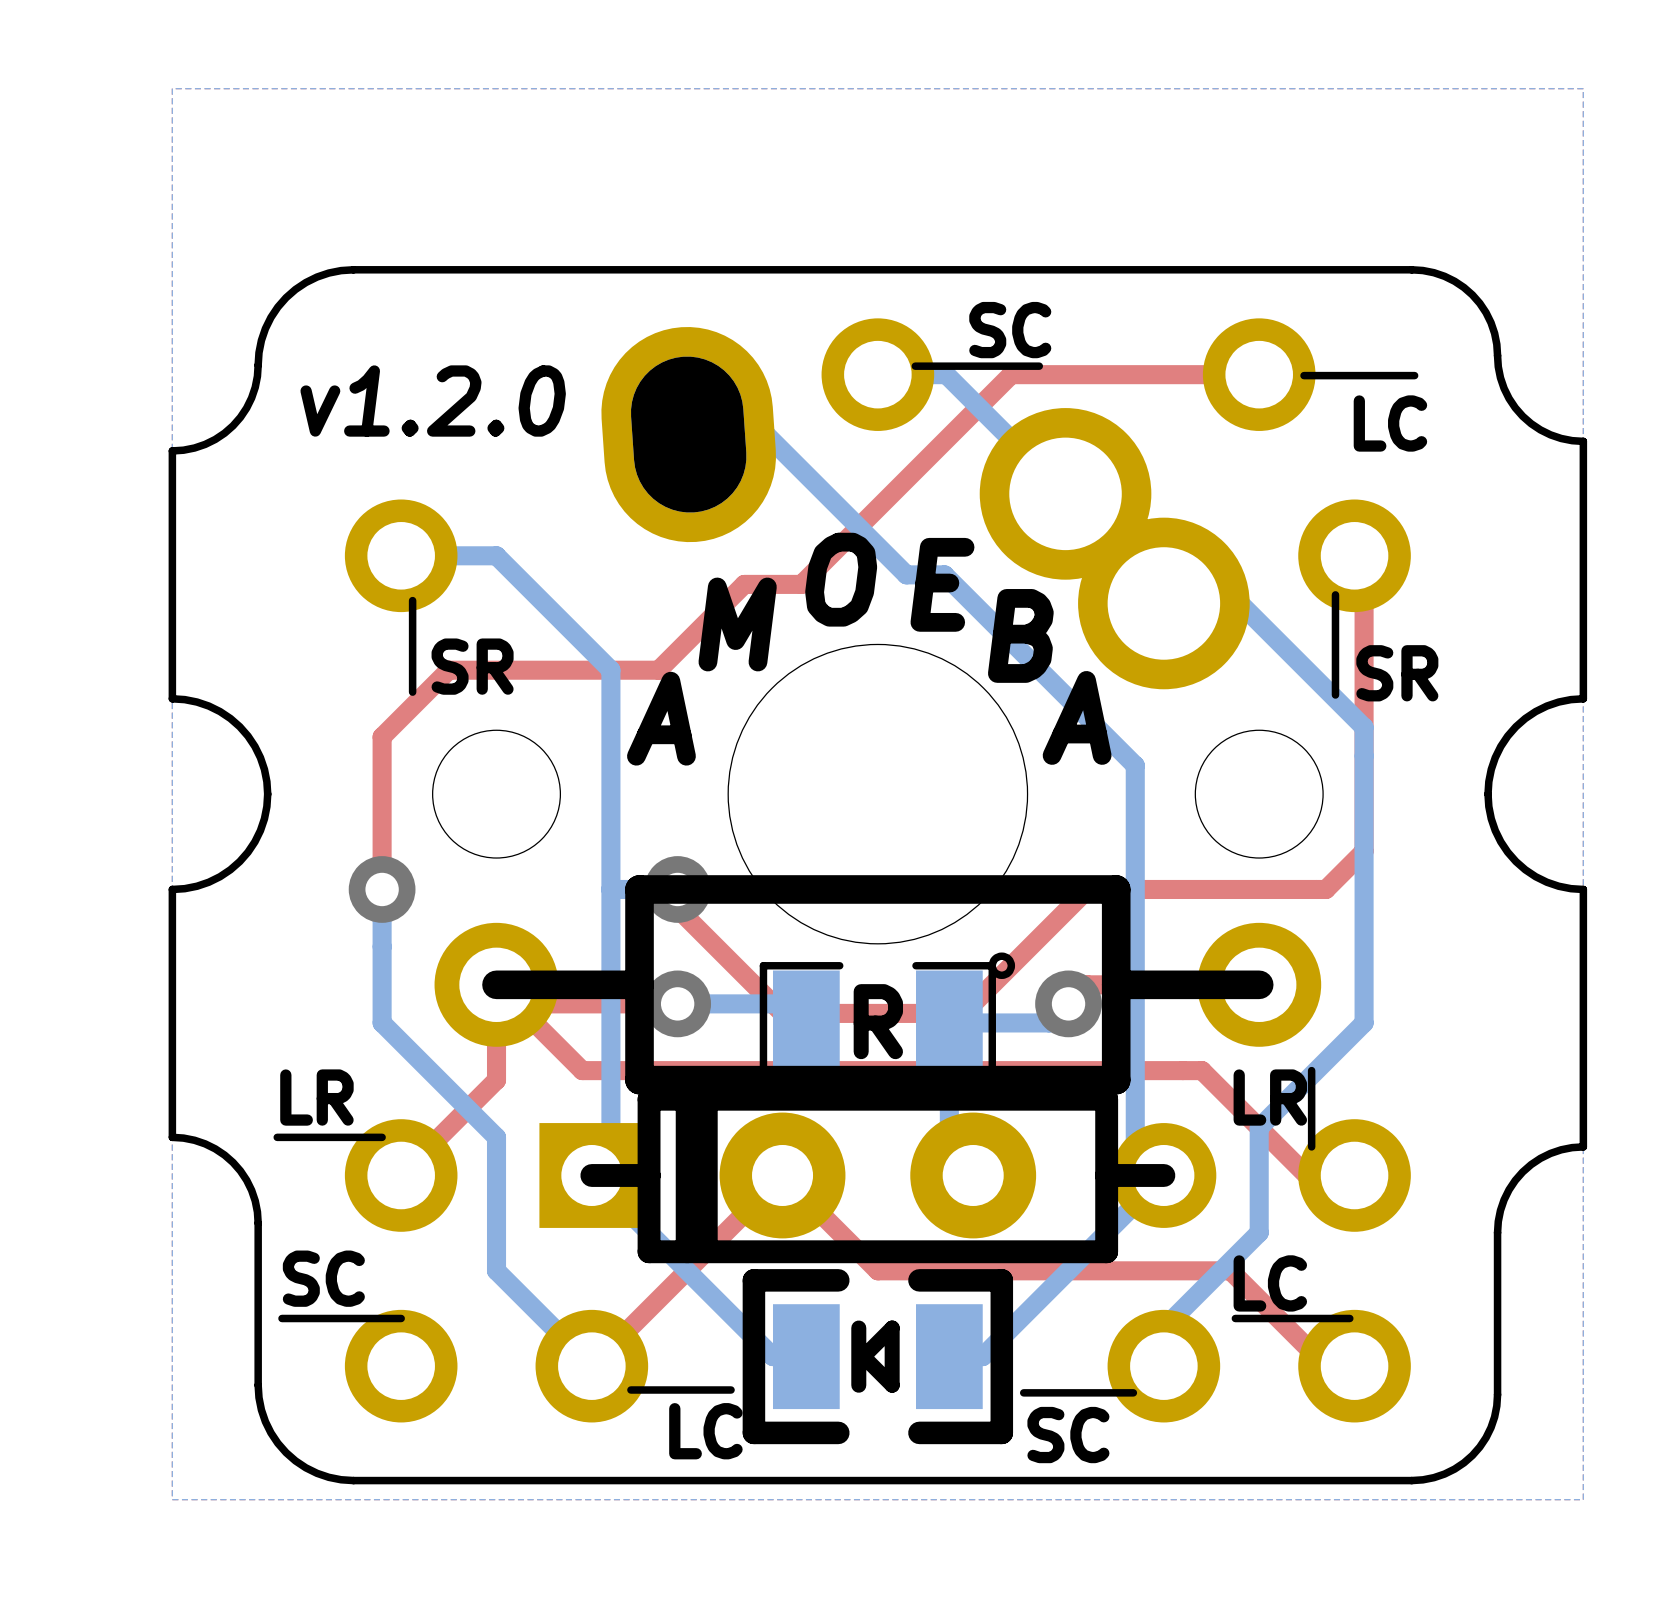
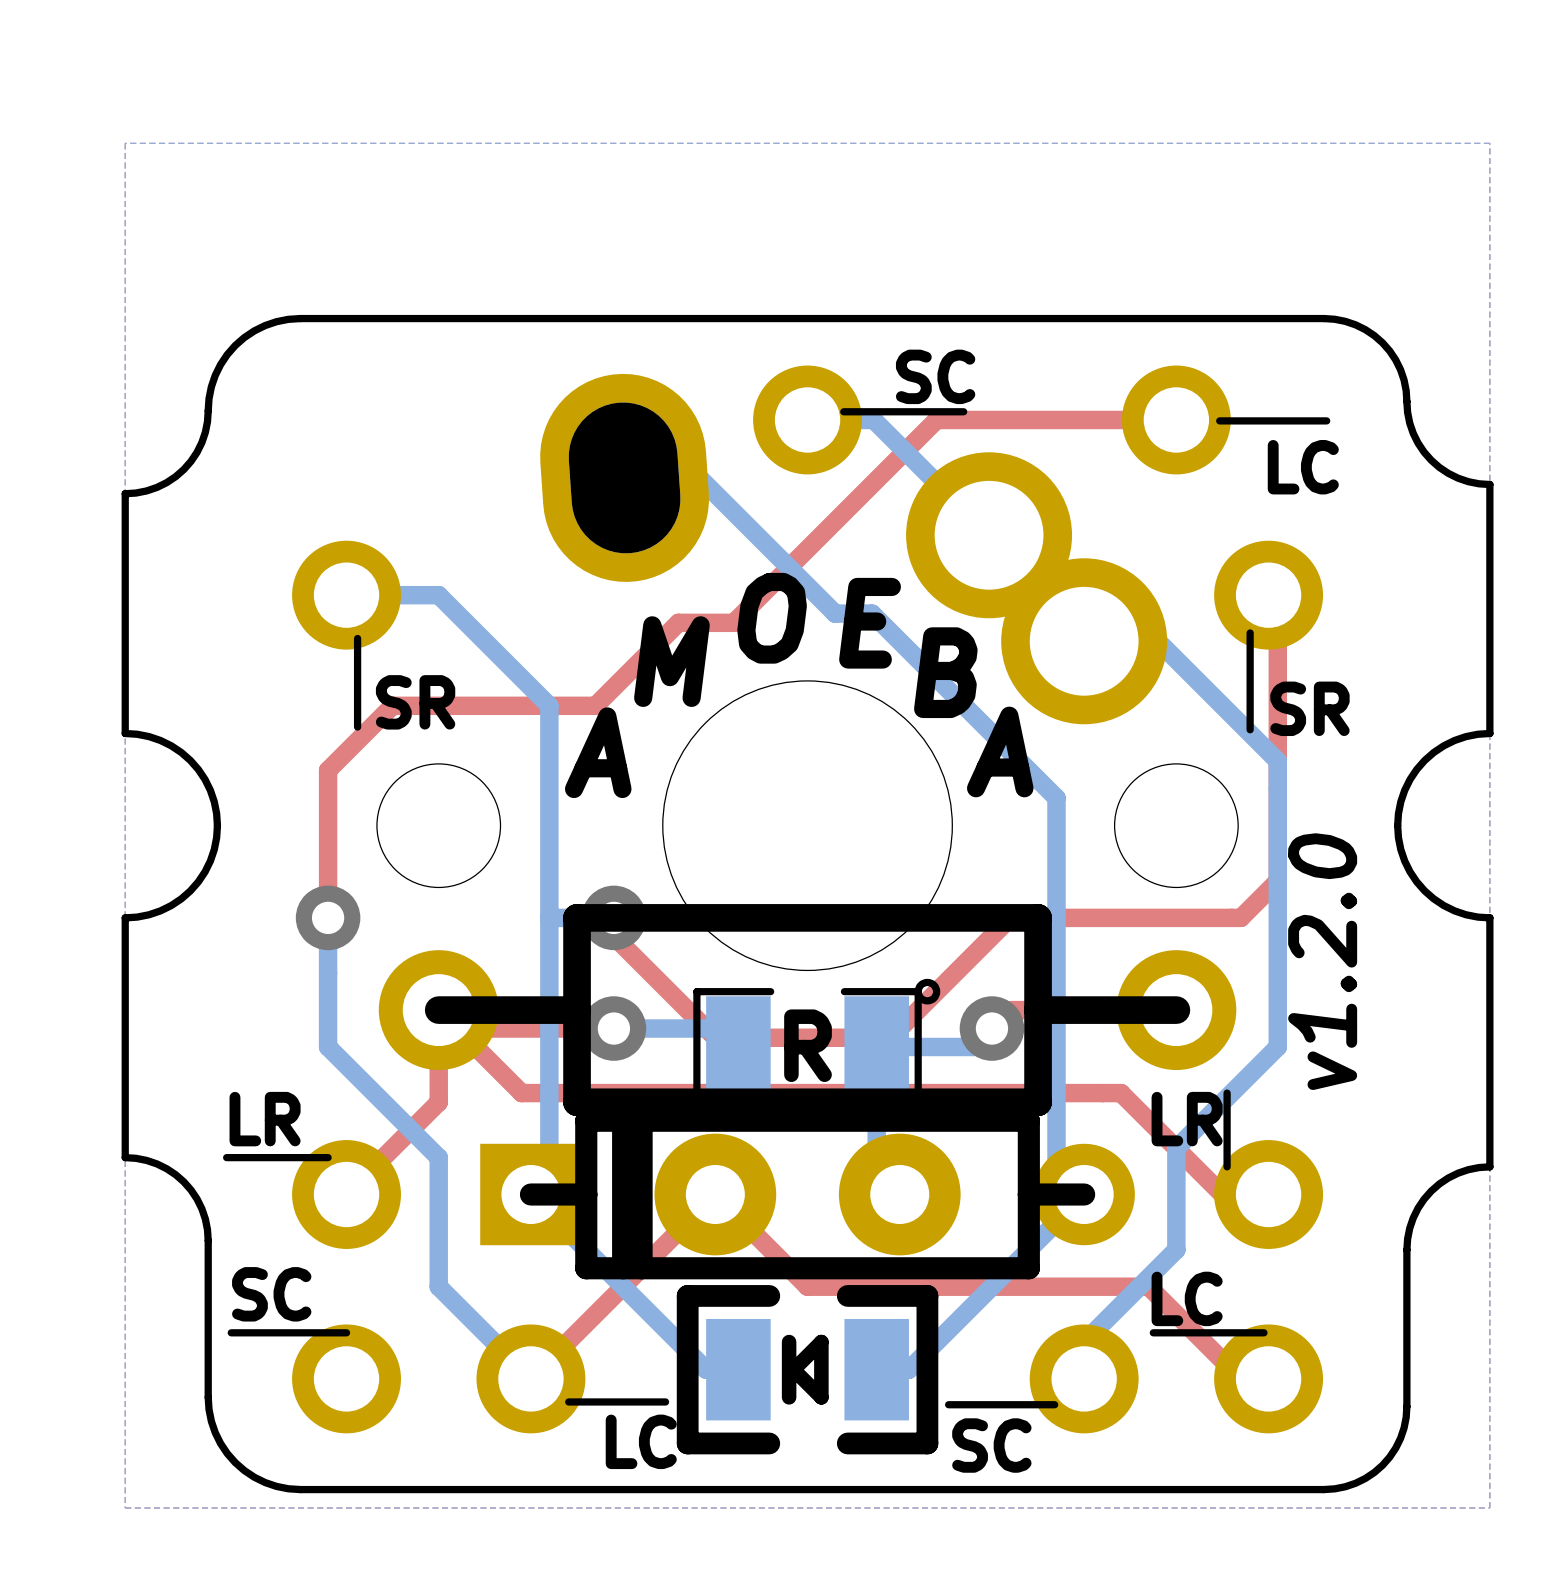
text rotation: 0° (433, 401) -> 90° counterclockwise (1322, 961)
text position: v1.2.0 (433, 401) -> v1.2.0 (1322, 961)

